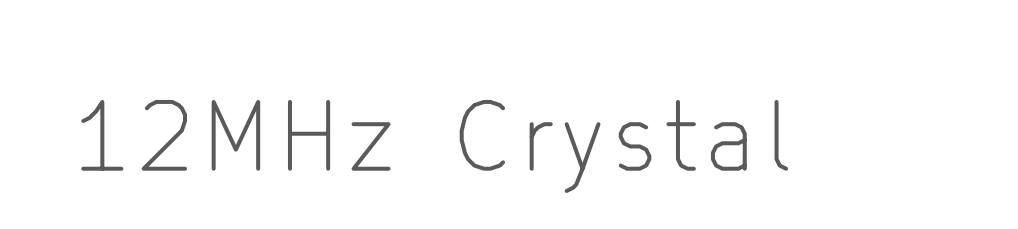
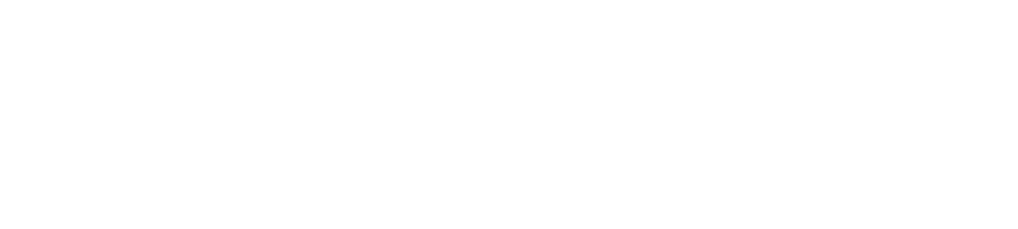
text: 12MHz Crystal (434, 146) -> none

